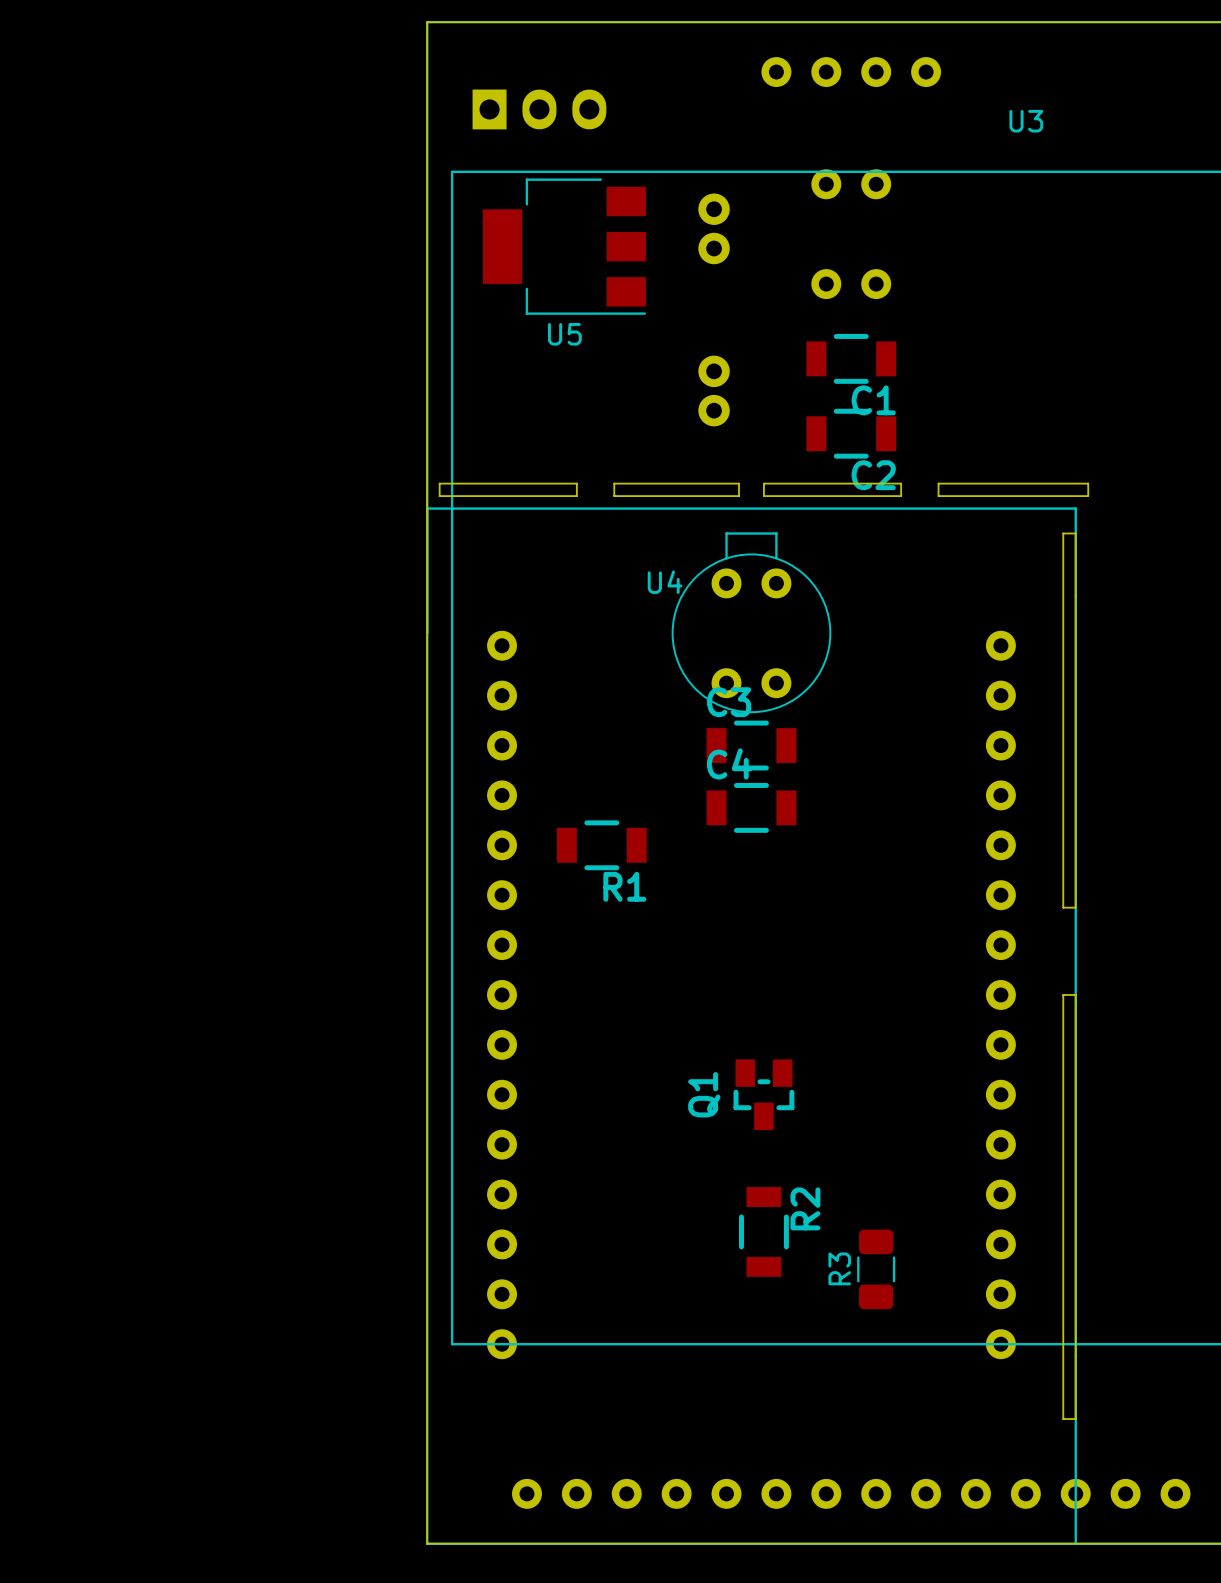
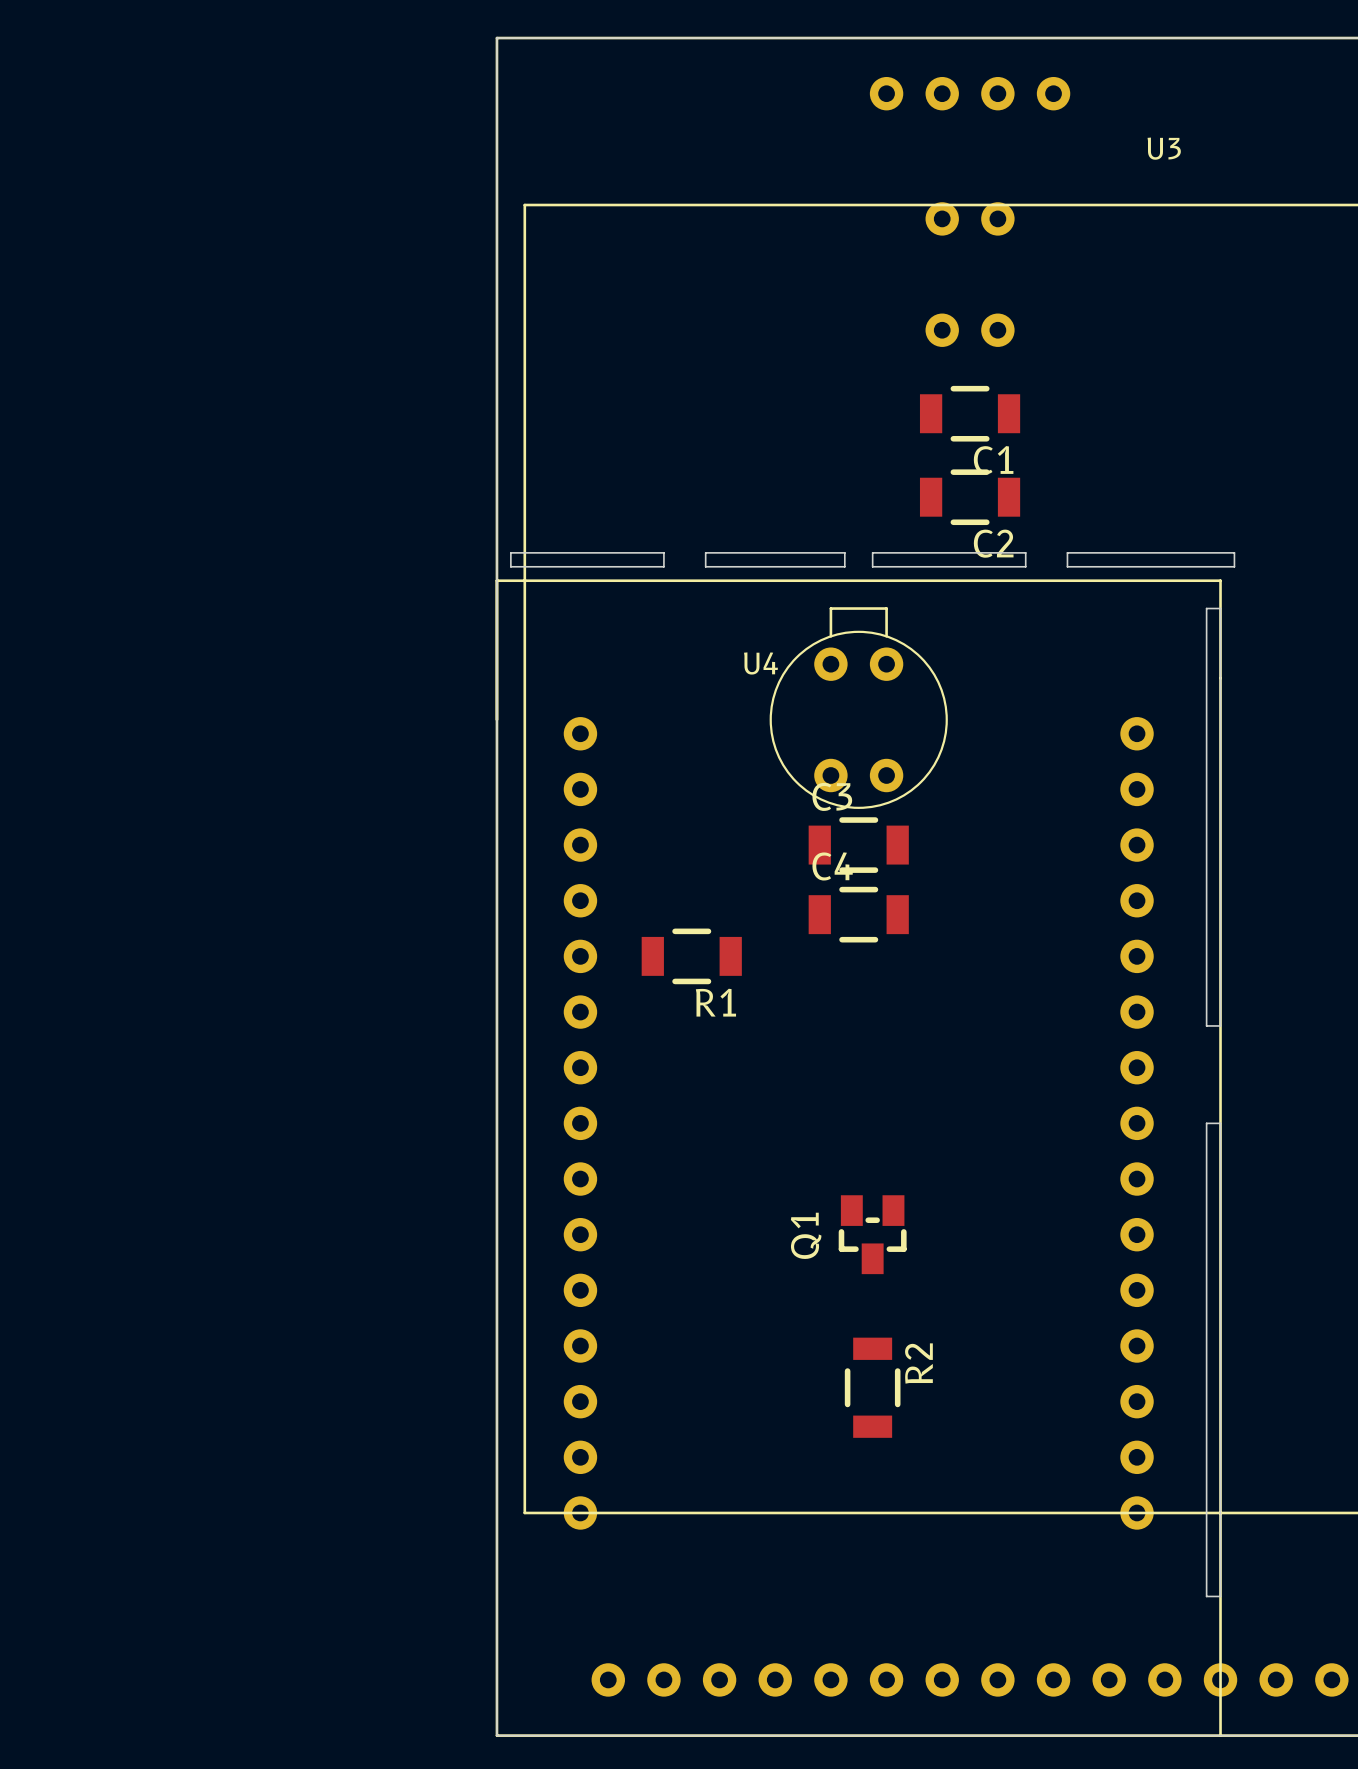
part: (539, 109) -> none
part: (714, 228) -> none
U5: (564, 246) -> none
part: (714, 391) -> none
R3: (876, 1269) -> none

